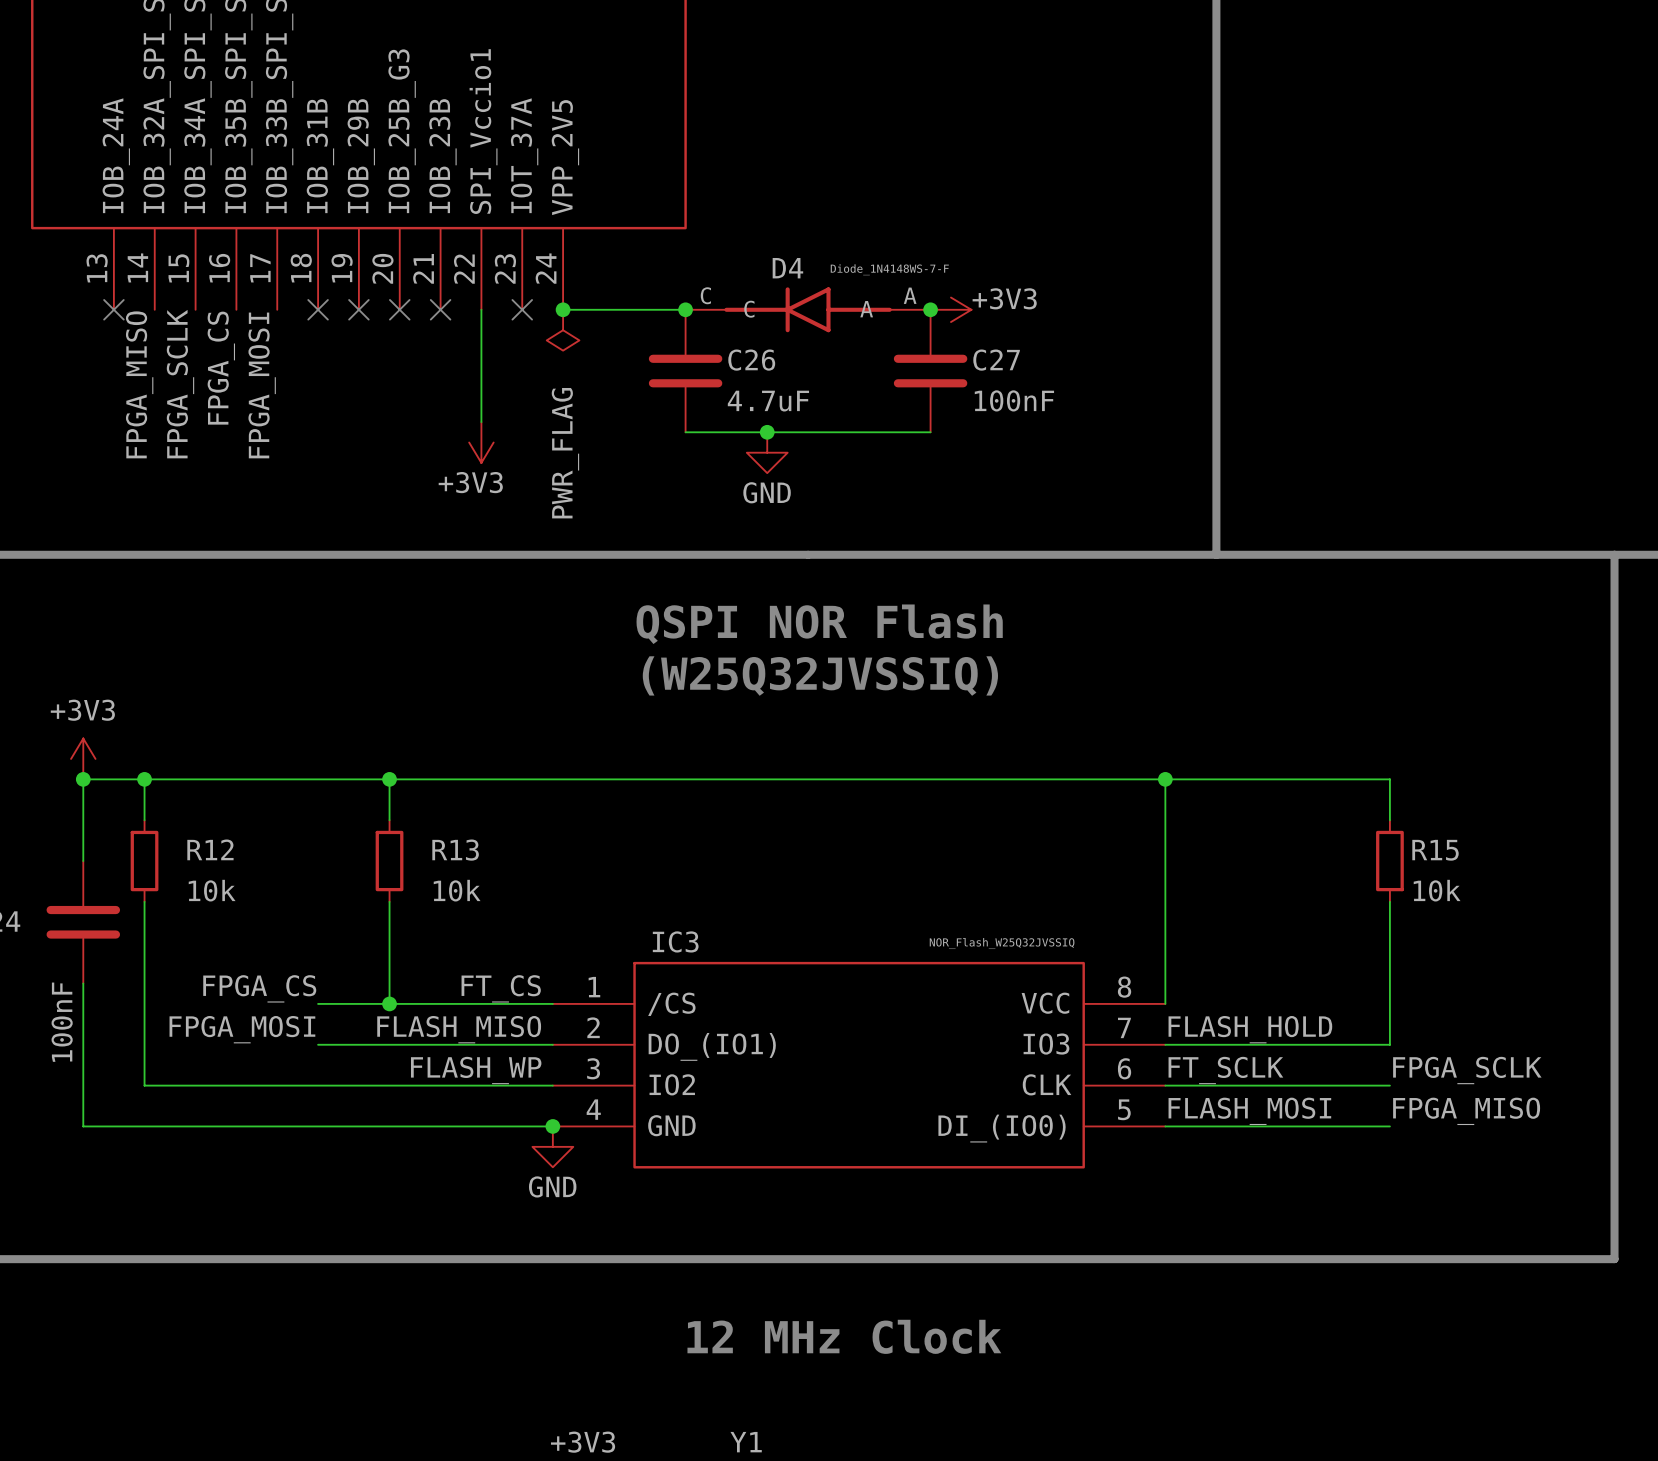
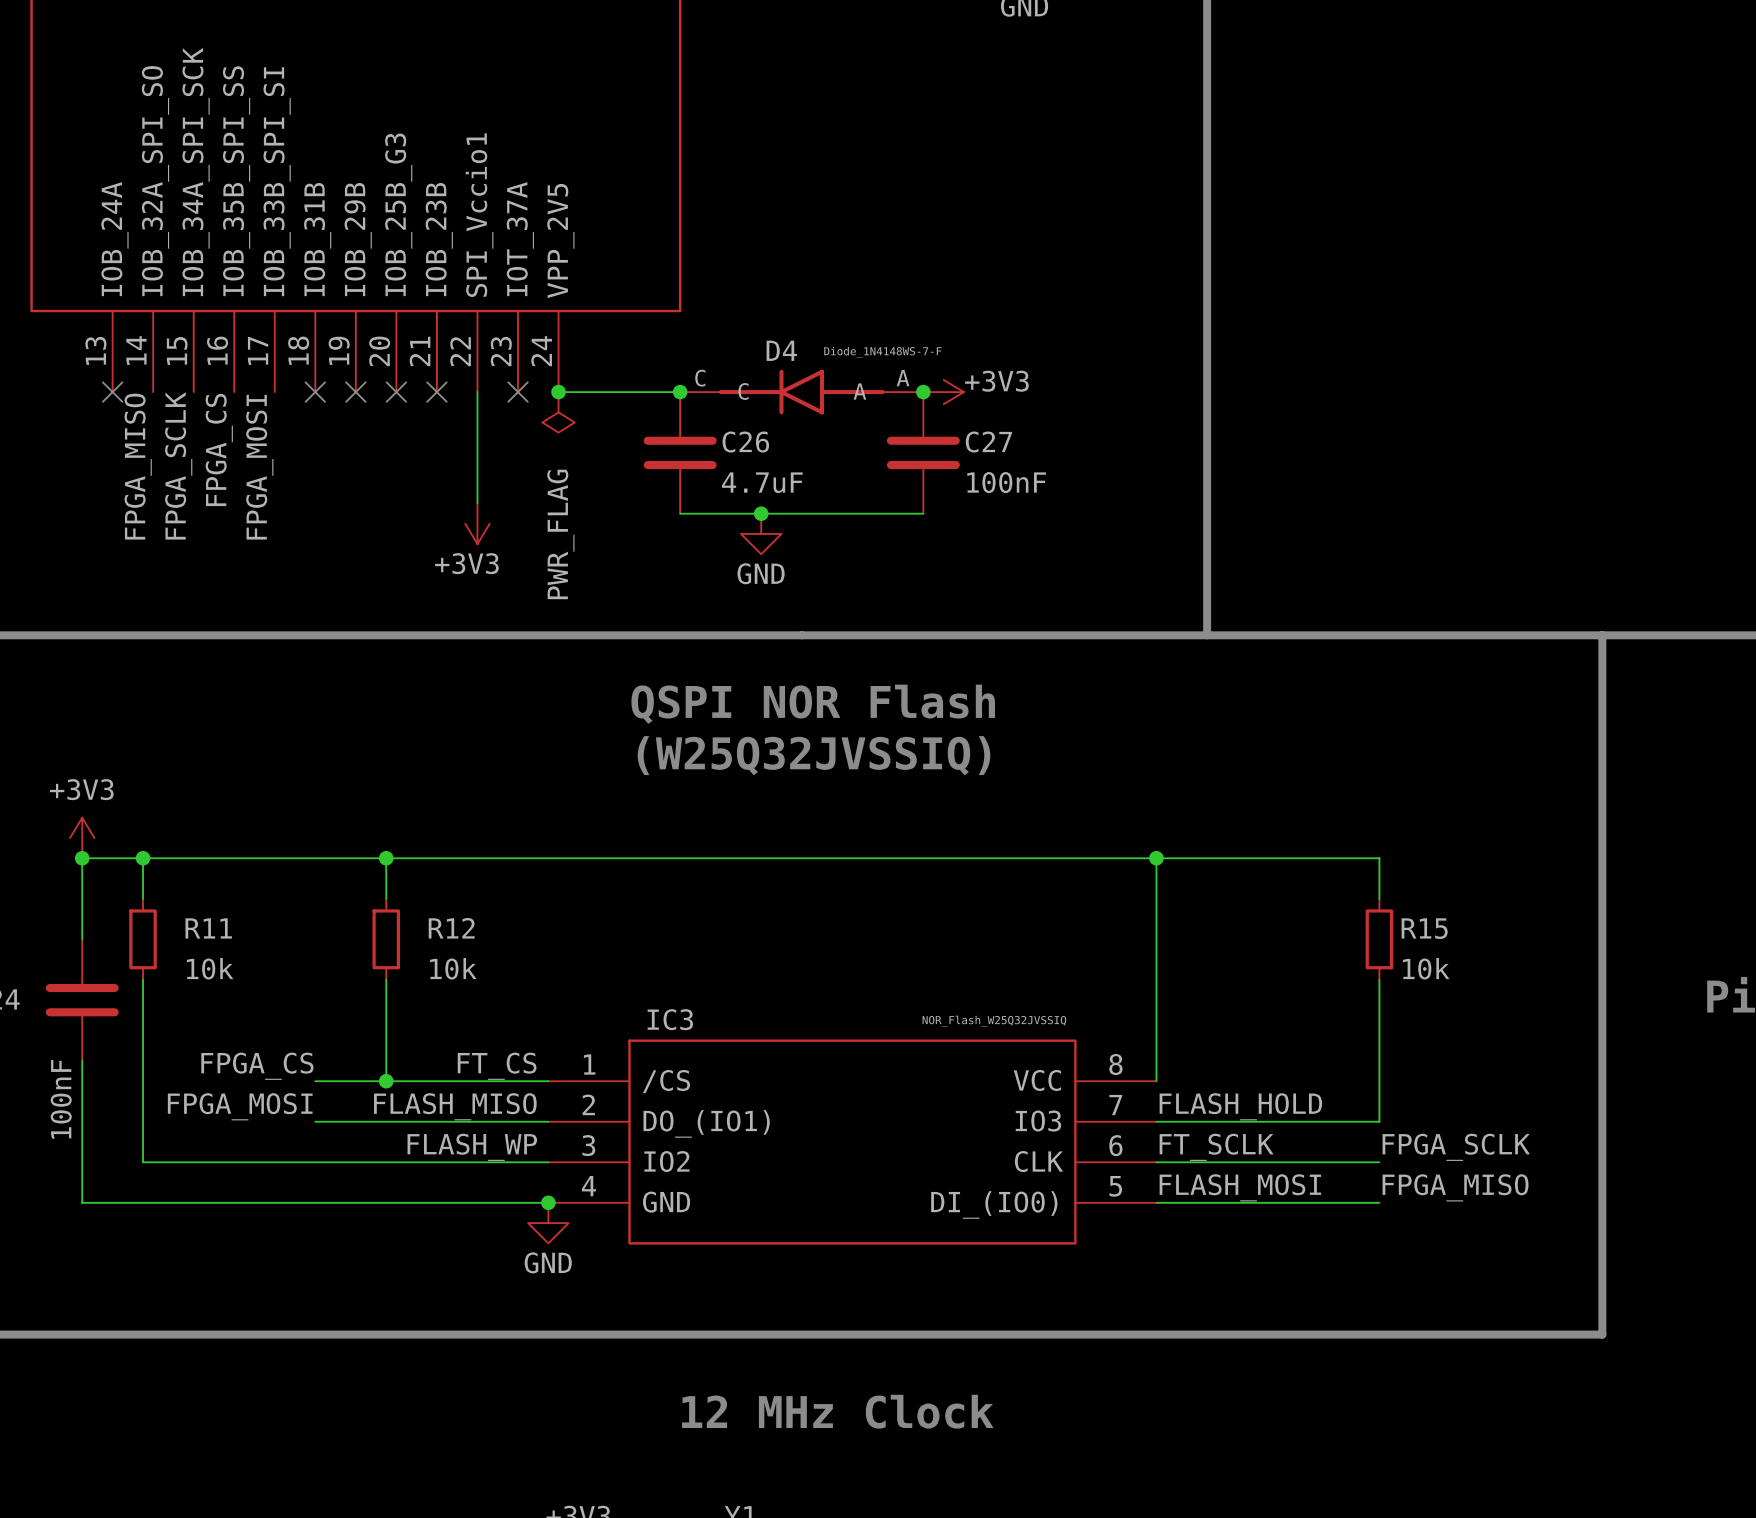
R12 name: R12 (210, 849) -> R11 (208, 928)
R13 name: R13 (455, 850) -> R12 (451, 928)

